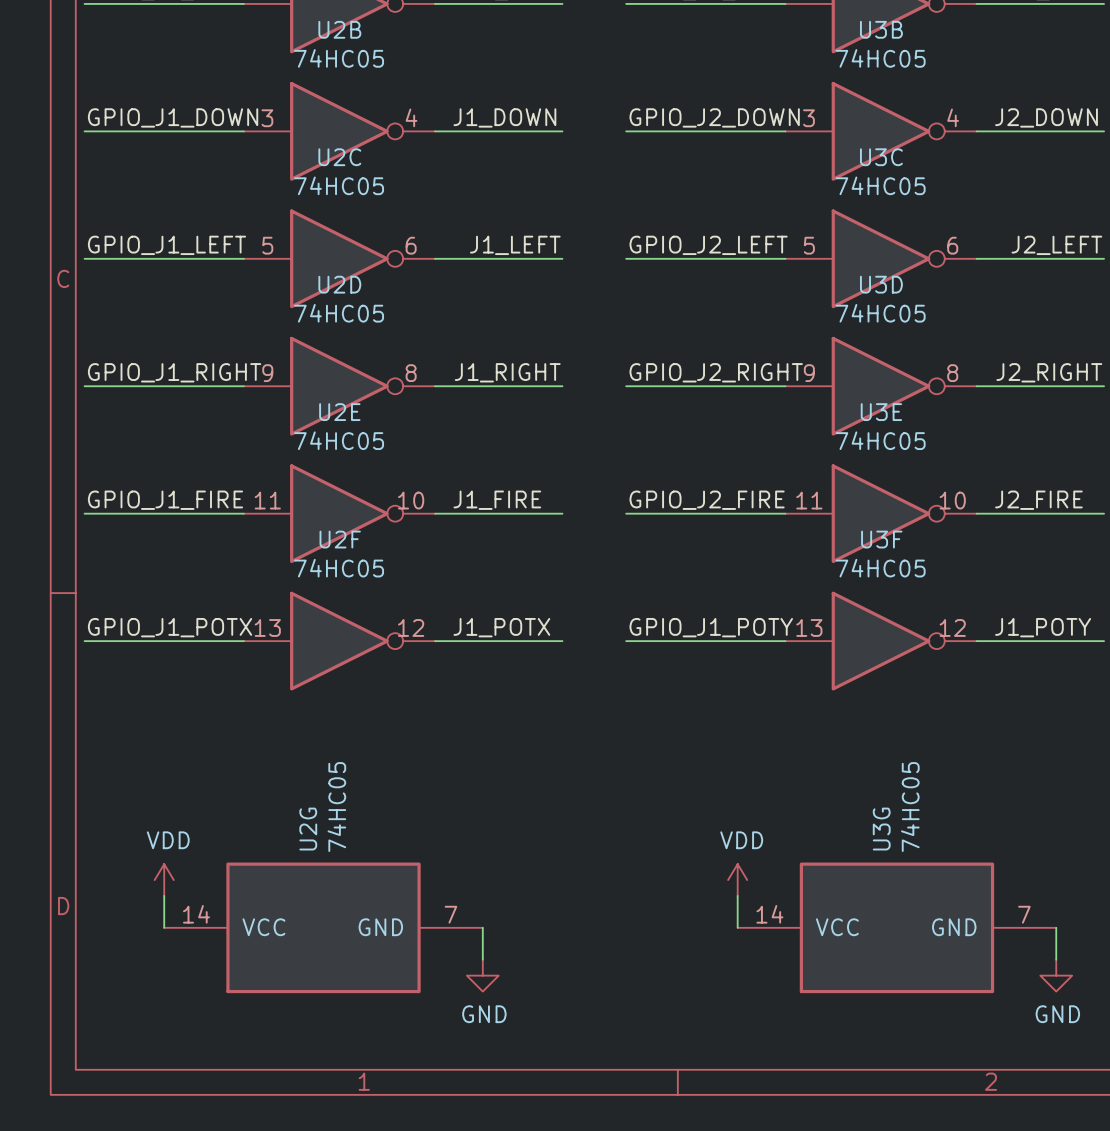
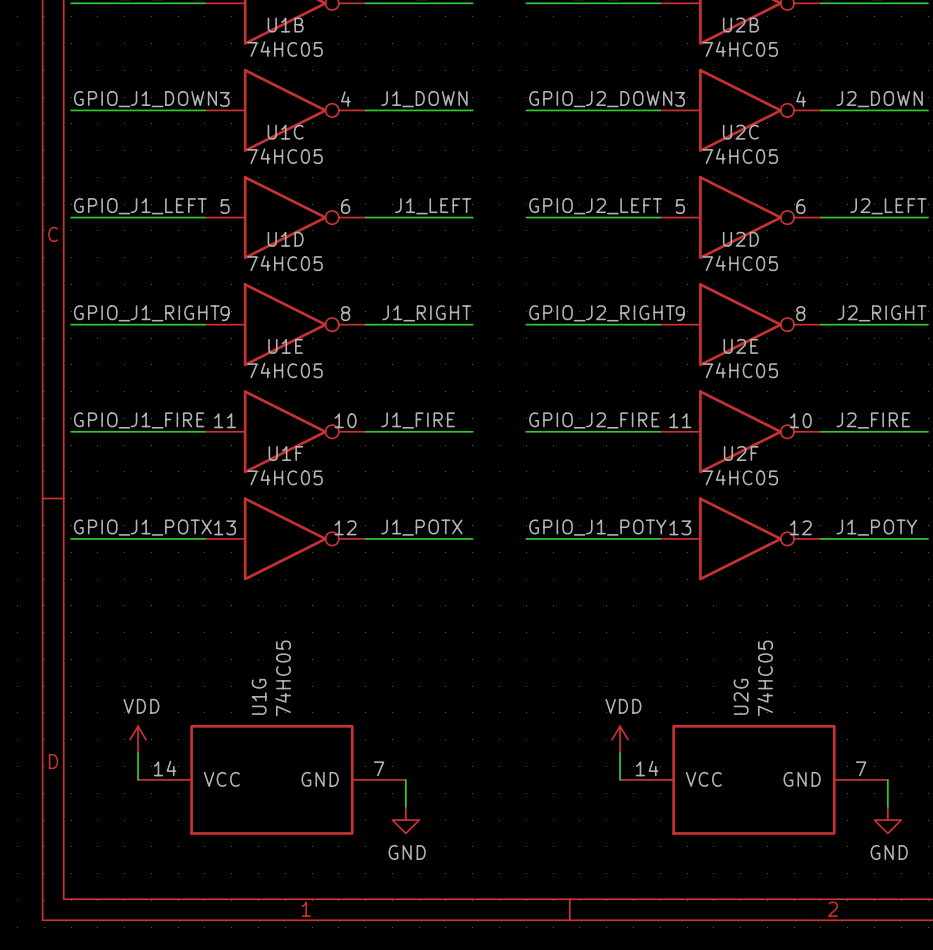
U2B name: U2B (339, 29) -> U1B (285, 25)
U3B name: U3B (881, 29) -> U2B (740, 25)
U2C name: U2C (339, 157) -> U1C (285, 132)
U3C name: U3C (881, 157) -> U2C (740, 132)
U2D name: U2D (339, 284) -> U1D (285, 239)
U3D name: U3D (881, 284) -> U2D (740, 239)
U2E name: U2E (339, 412) -> U1E (285, 346)
U3E name: U3E (881, 412) -> U2E (740, 346)
U2F name: U2F (340, 539) -> U1F (285, 453)
U3F name: U3F (881, 539) -> U2F (741, 453)
U2G name: U2G (308, 829) -> U1G (259, 696)
U3G name: U3G (881, 829) -> U2G (741, 696)

